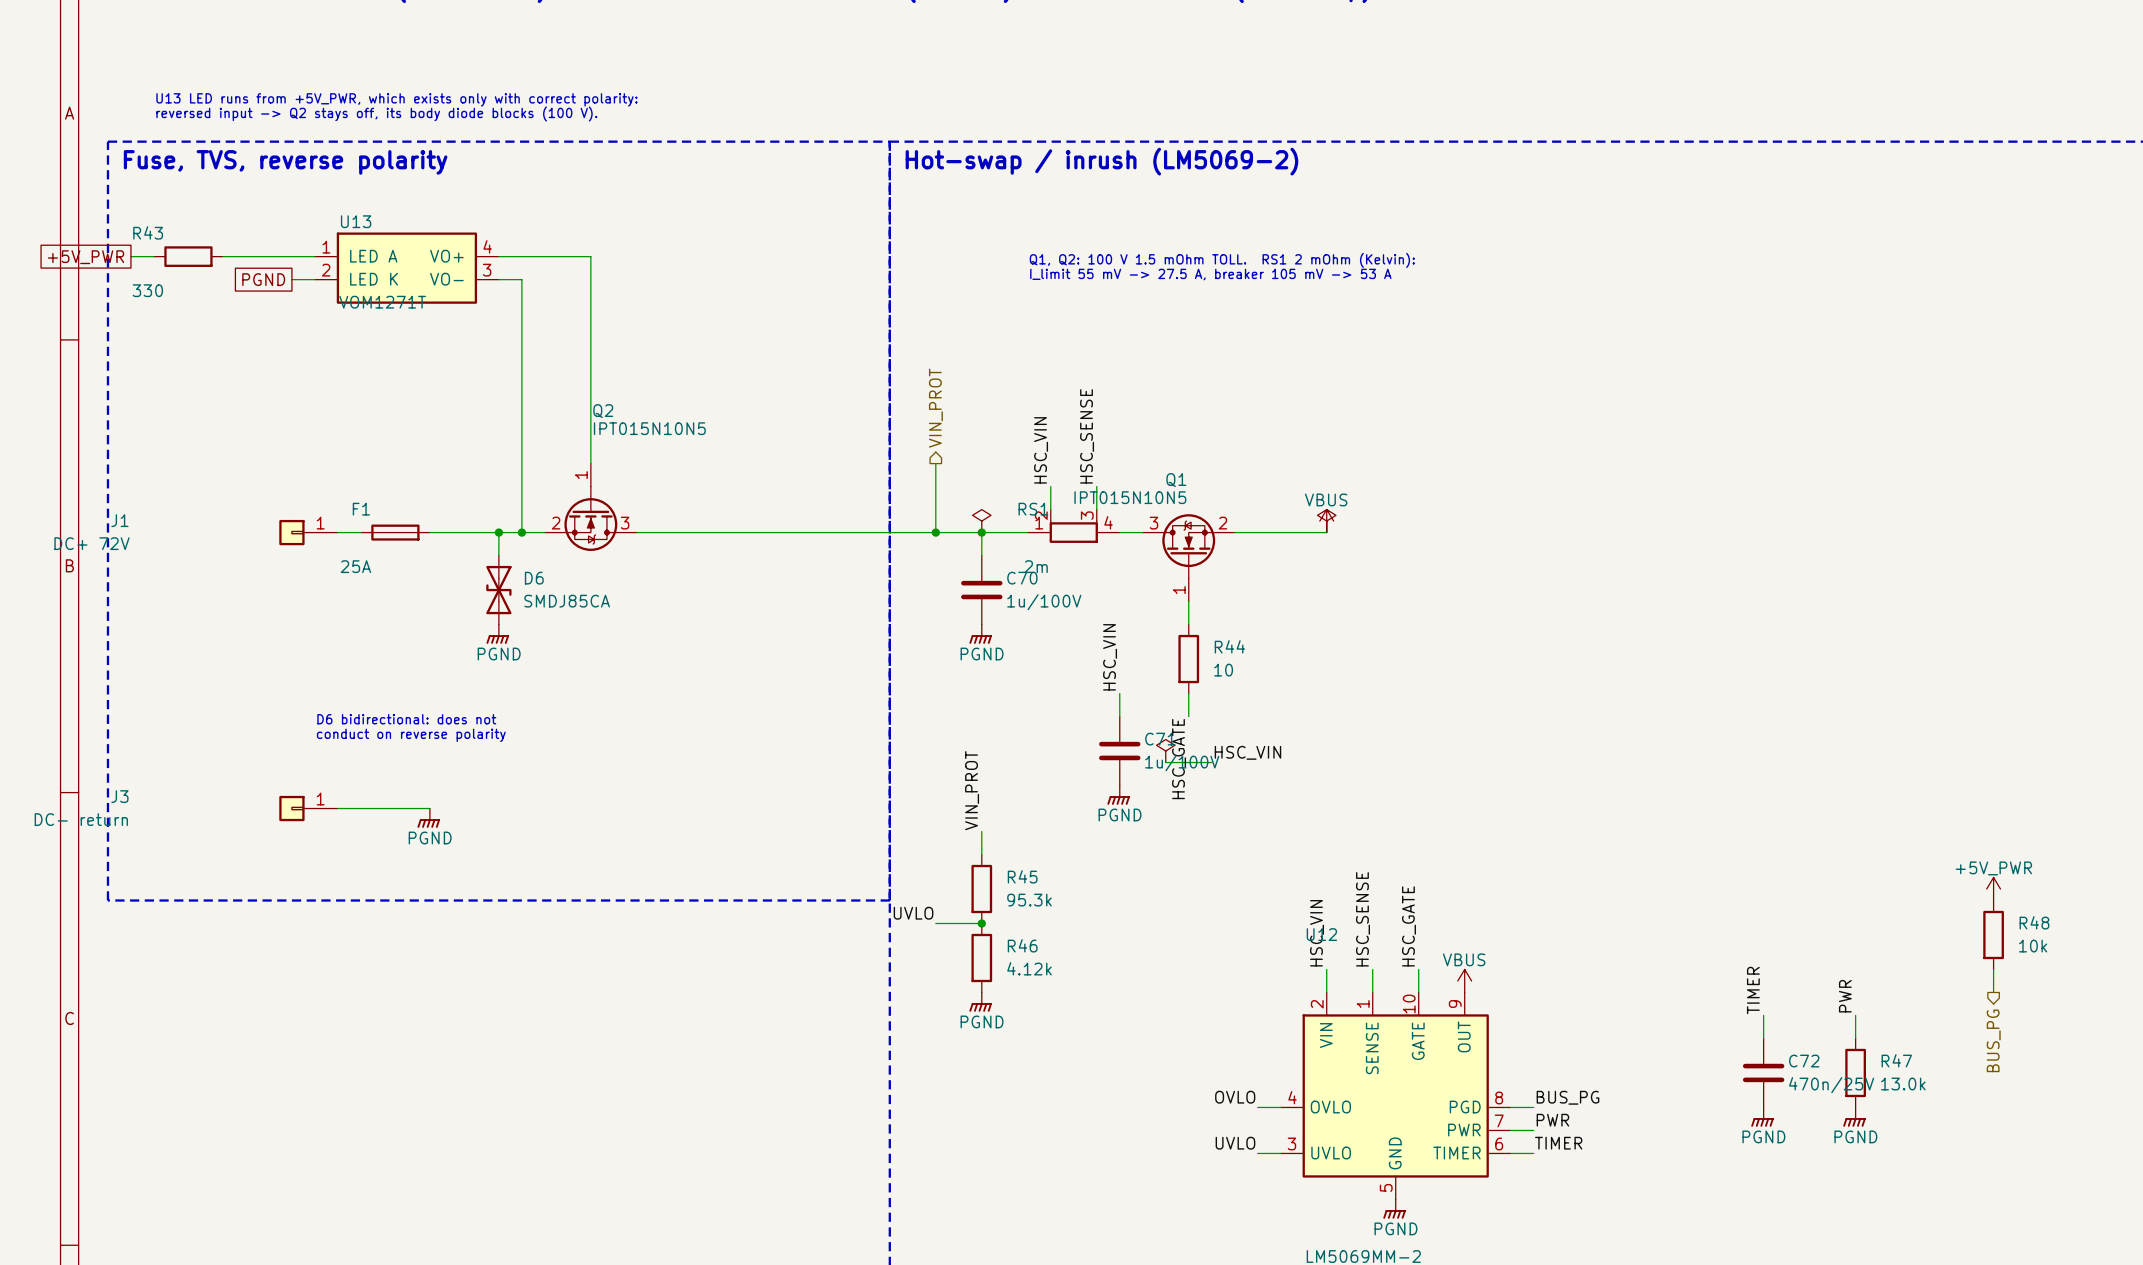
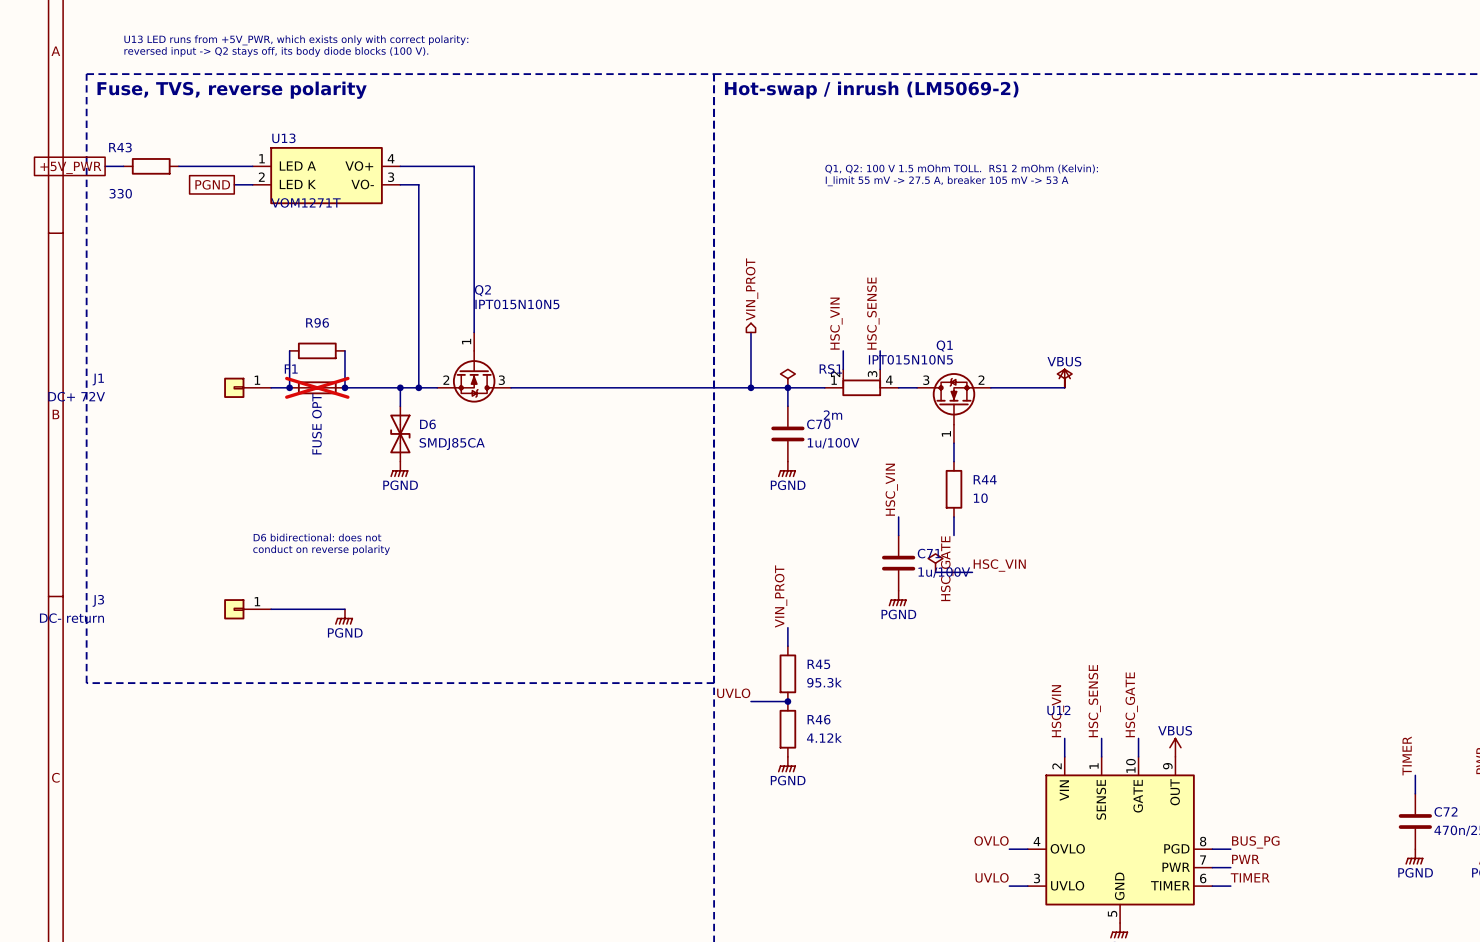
wire: none -> (289, 350) (289, 387)
R96: none -> (317, 350)
wire: none -> (344, 350) (344, 387)
junction: none -> (289, 387)
F1 do-not-place cross: none -> (317, 387)
junction: none -> (344, 387)
F1 value: 25A (355, 566) -> FUSE OPT (316, 424)

